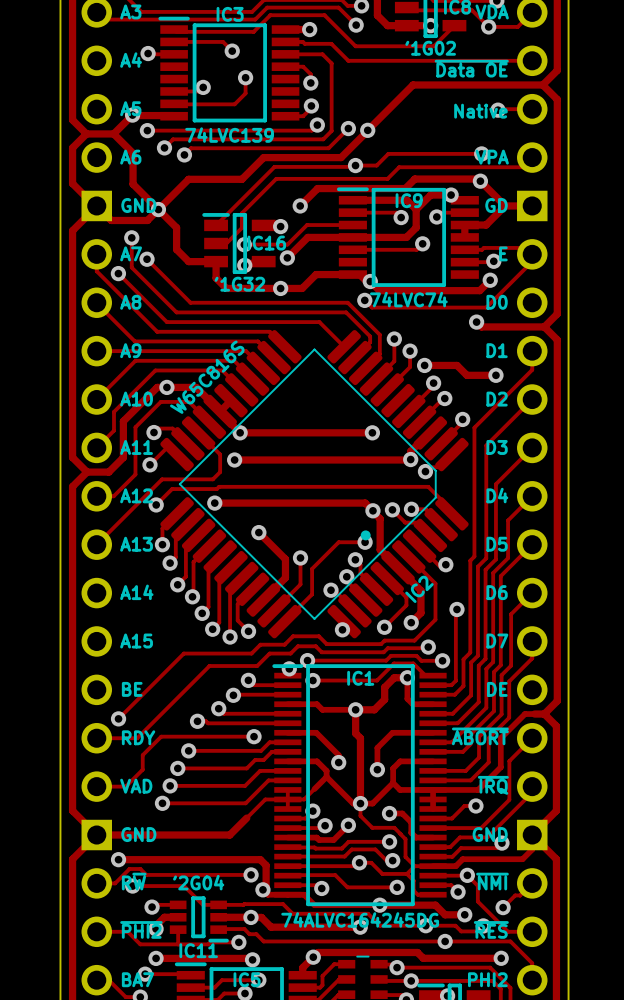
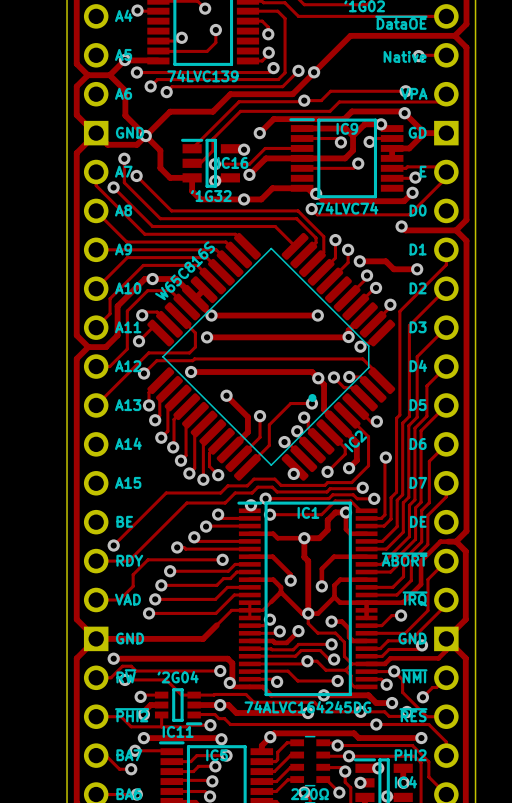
text: ~{Data OE} (471, 68) -> ~{DataOE} (401, 22)

